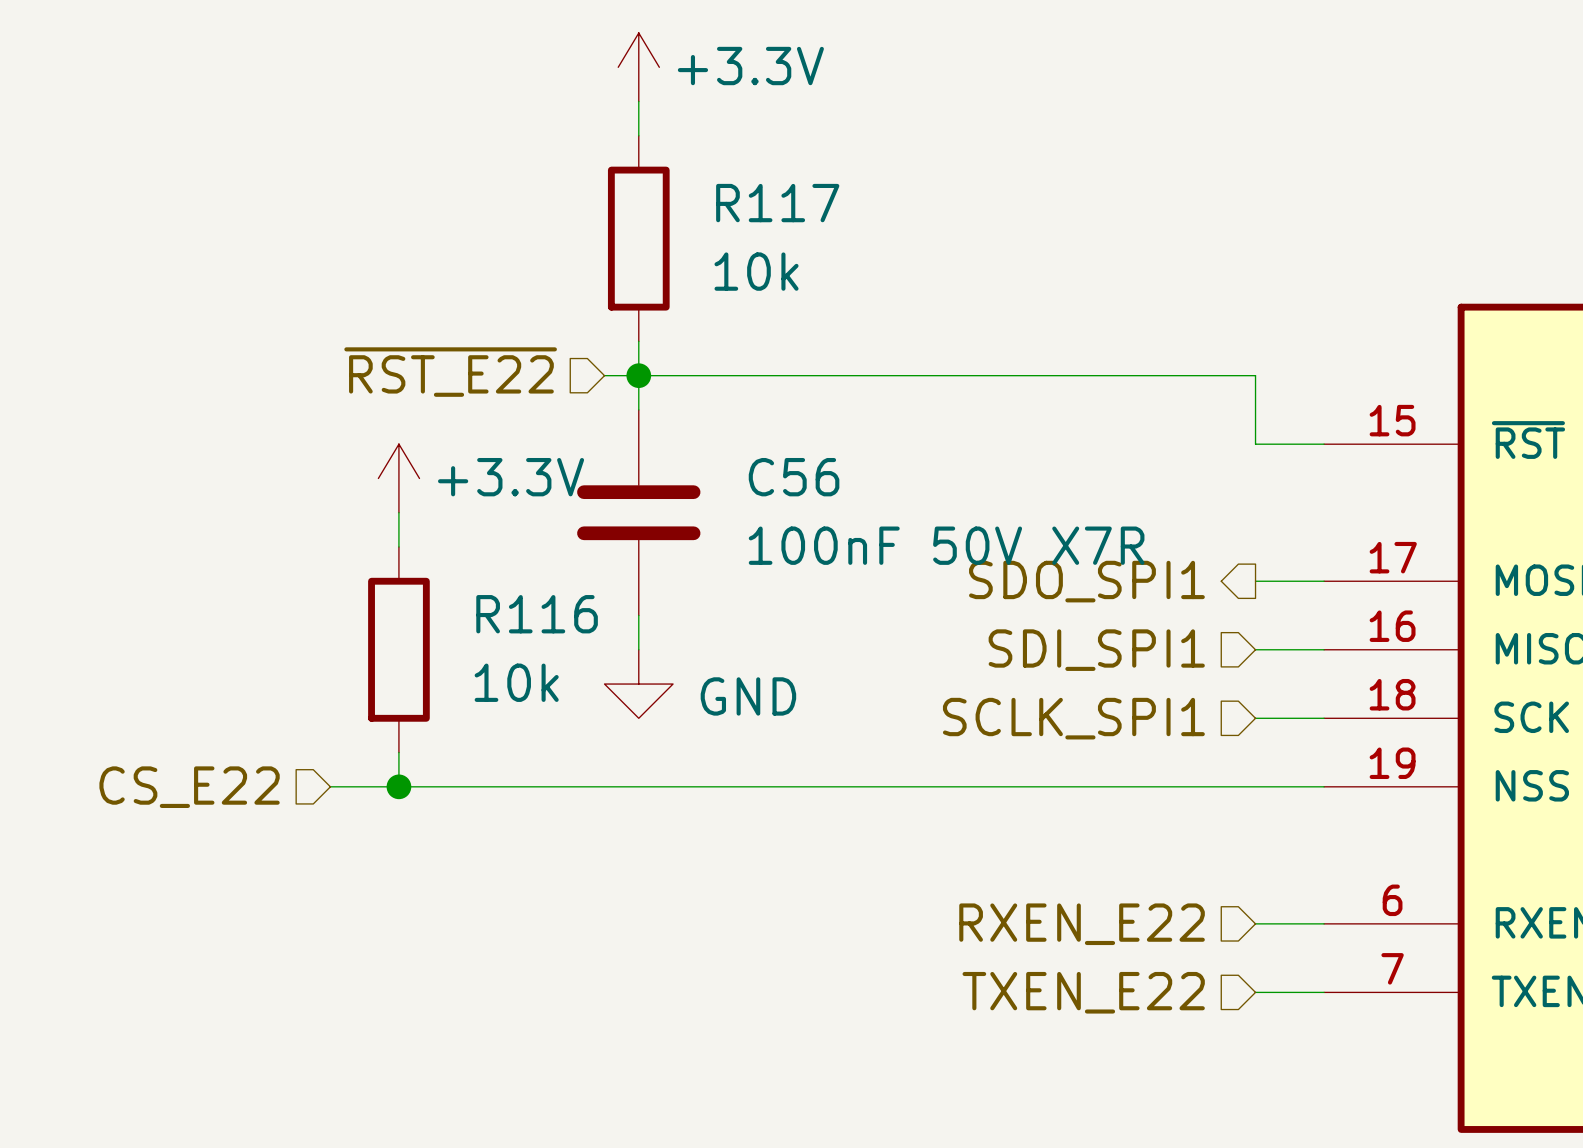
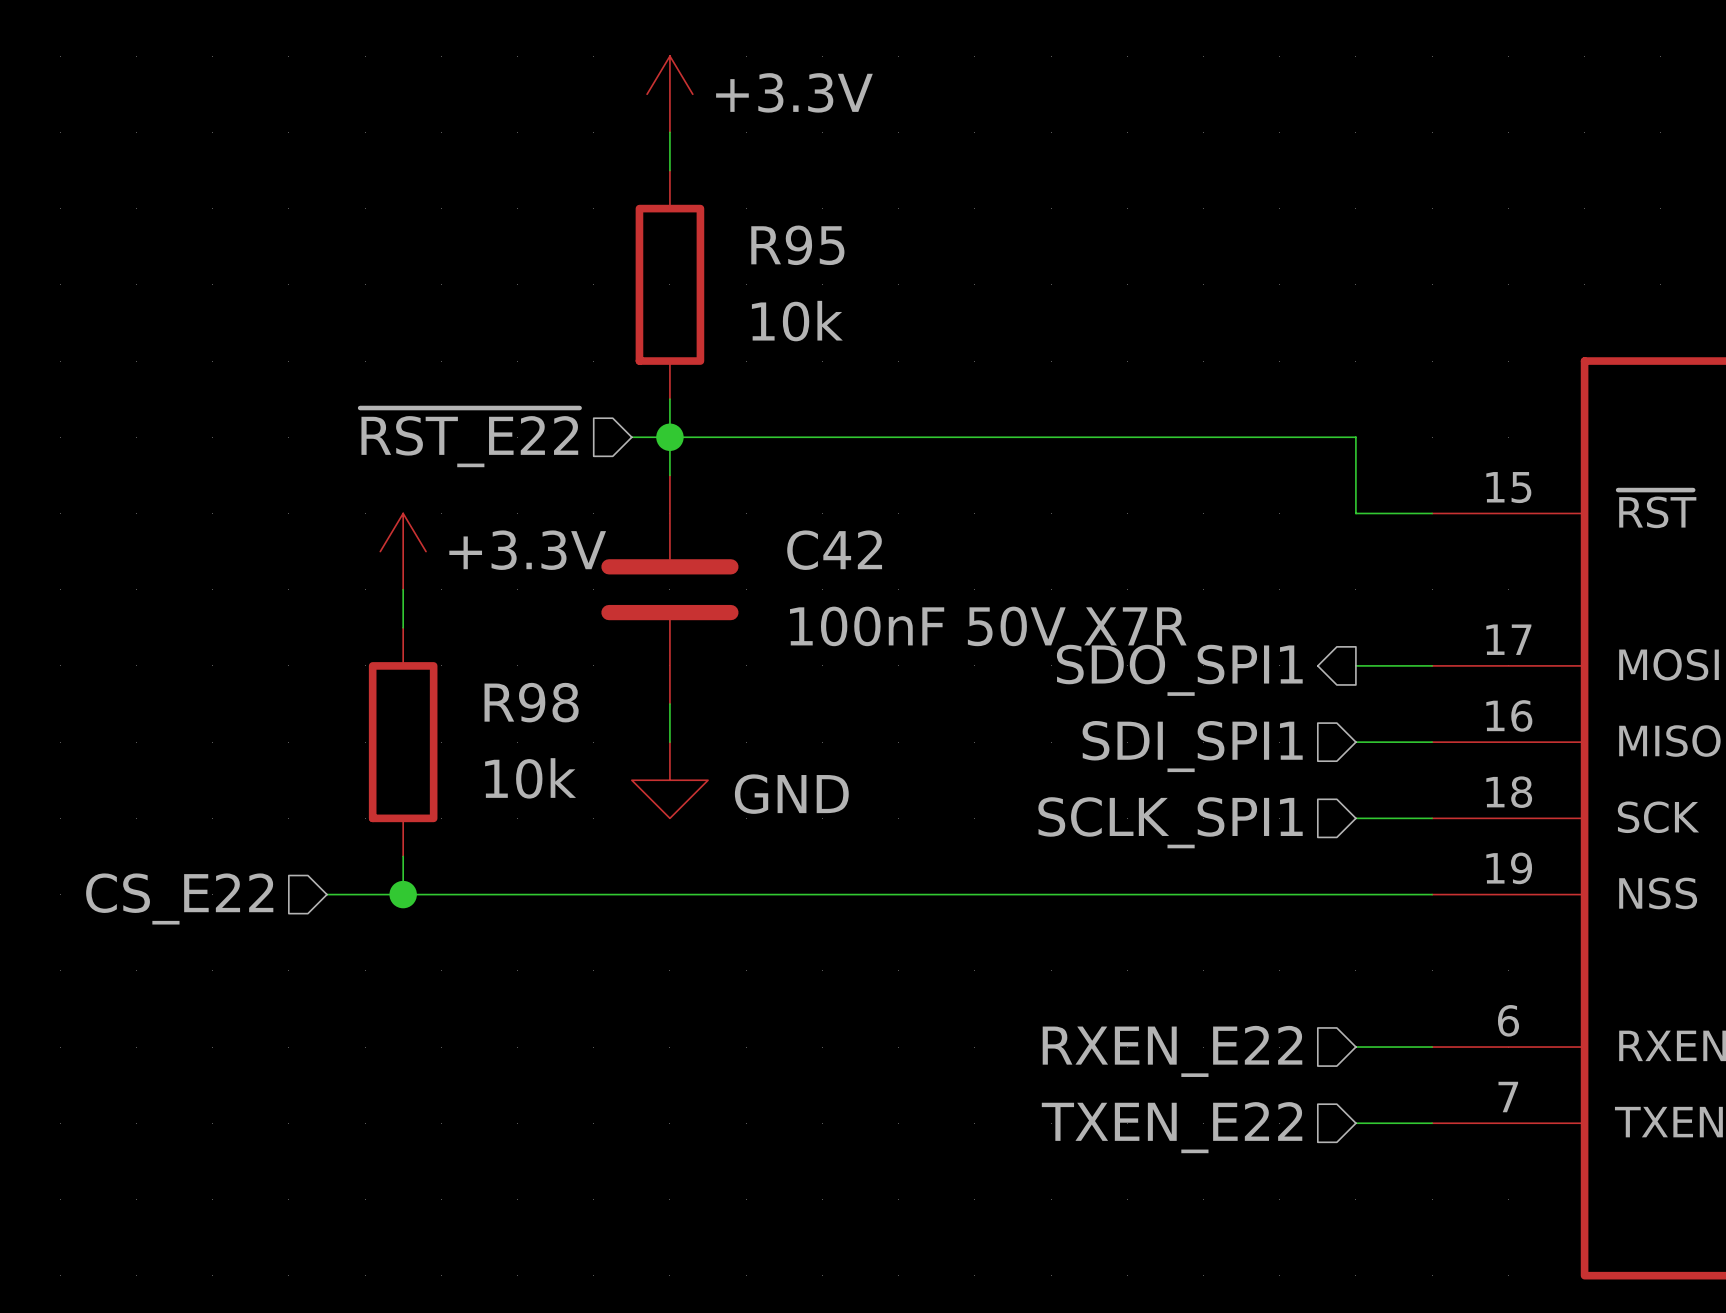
R117 name: R117 (777, 203) -> R95 (797, 245)
C56 name: C56 (794, 477) -> C42 (834, 550)
R116 name: R116 (537, 614) -> R98 (531, 702)

